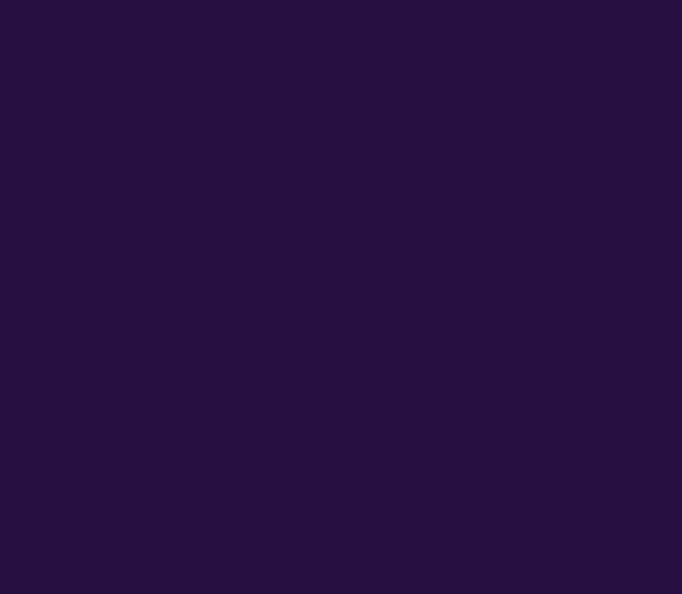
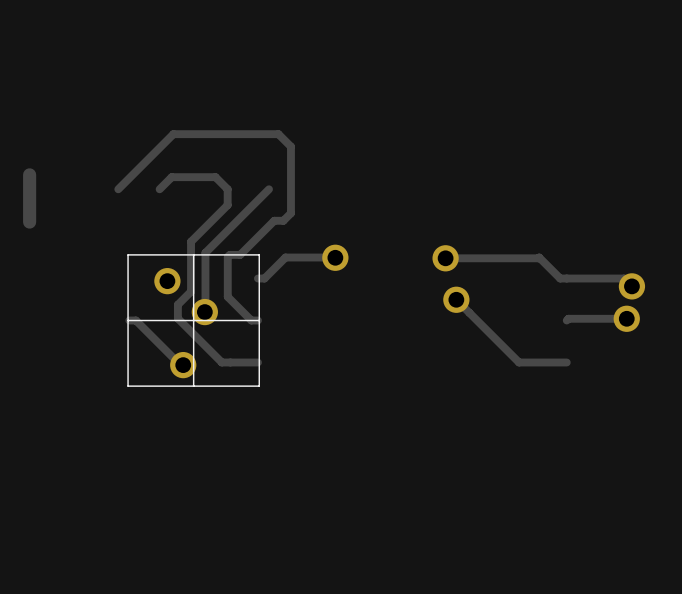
track: none -> (29, 174) (29, 222)
track: none -> (118, 189) (173, 134) (278, 134) (290, 146) (290, 213) (283, 220) (274, 220) (240, 254) (229, 254) (227, 256) (227, 296) (251, 320) (257, 320)
track: none -> (159, 189) (171, 177) (215, 177) (227, 189) (227, 205) (191, 241) (191, 291) (177, 304) (177, 318) (221, 362) (257, 362)
track: none -> (268, 189) (205, 252) (204, 312)
line: none -> (128, 254) (259, 254) (259, 386) (128, 386) (128, 254)
line: none -> (193, 254) (193, 386)
track: none -> (335, 257) (285, 257) (264, 278) (257, 278)
via: none -> (335, 257)
track: none -> (445, 258) (539, 257) (560, 278) (624, 278) (631, 286)
via: none -> (445, 258)
via: none -> (167, 281)
via: none -> (631, 286)
track: none -> (456, 299) (519, 362) (566, 362)
via: none -> (456, 299)
via: none -> (204, 312)
track: none -> (626, 318) (568, 318) (566, 320)
via: none -> (626, 318)
line: none -> (128, 320) (259, 320)
track: none -> (129, 320) (135, 320) (180, 365) (183, 365)
via: none -> (183, 365)

